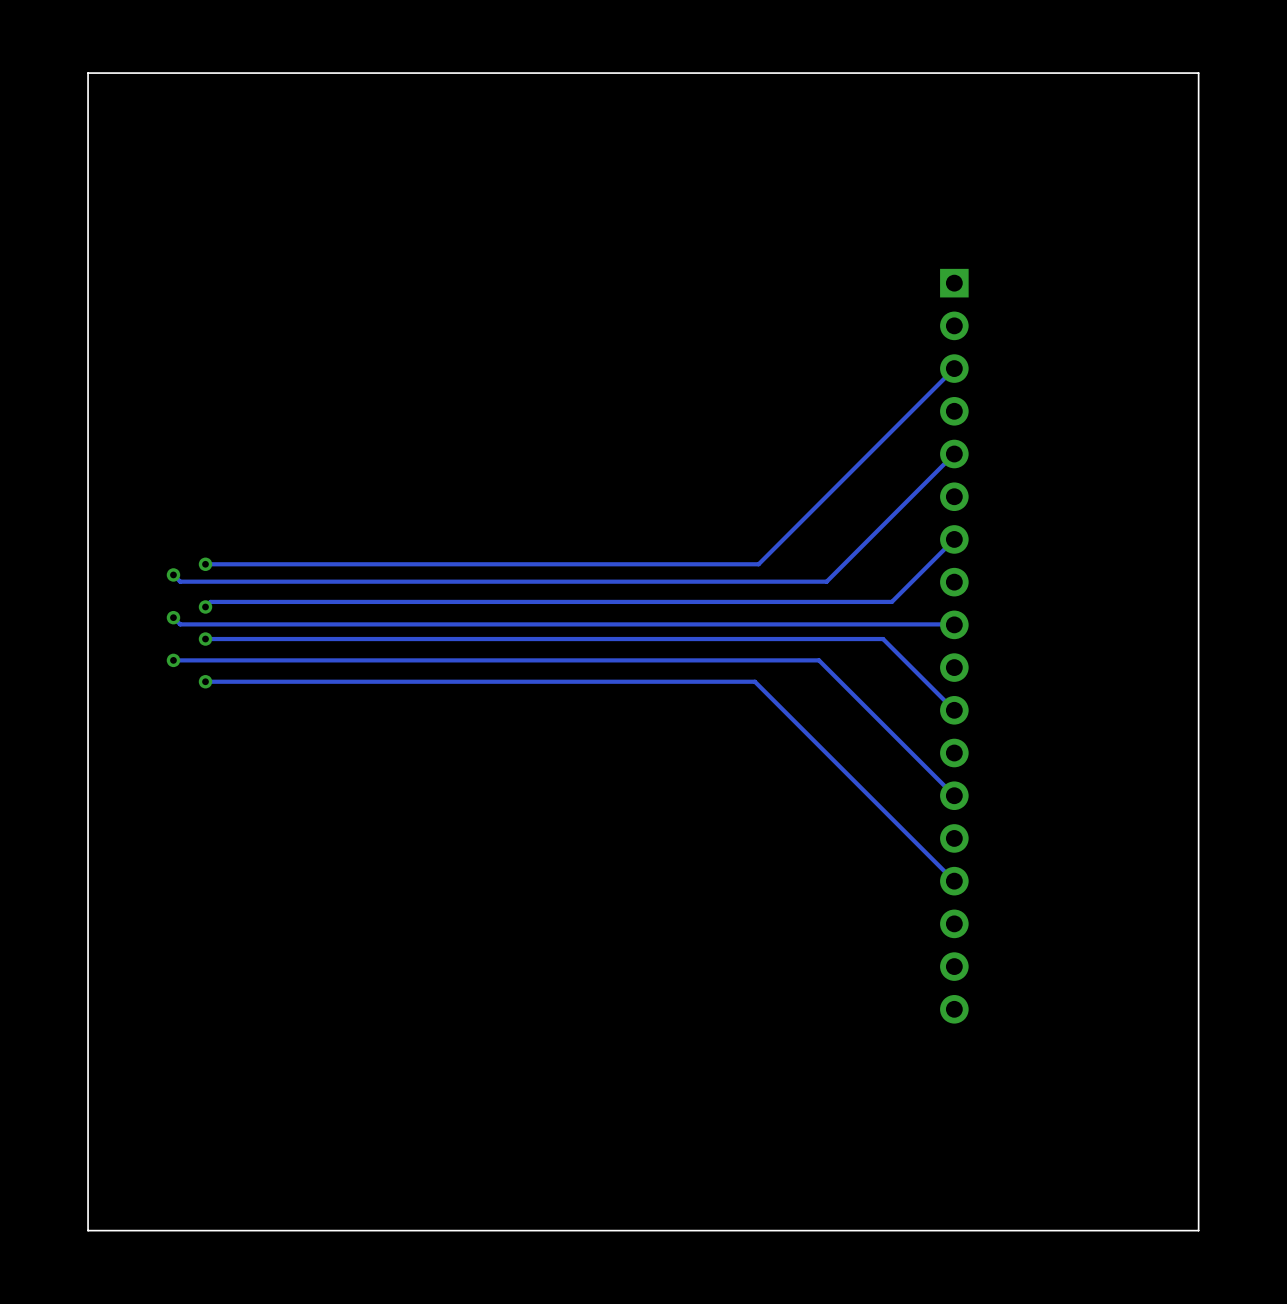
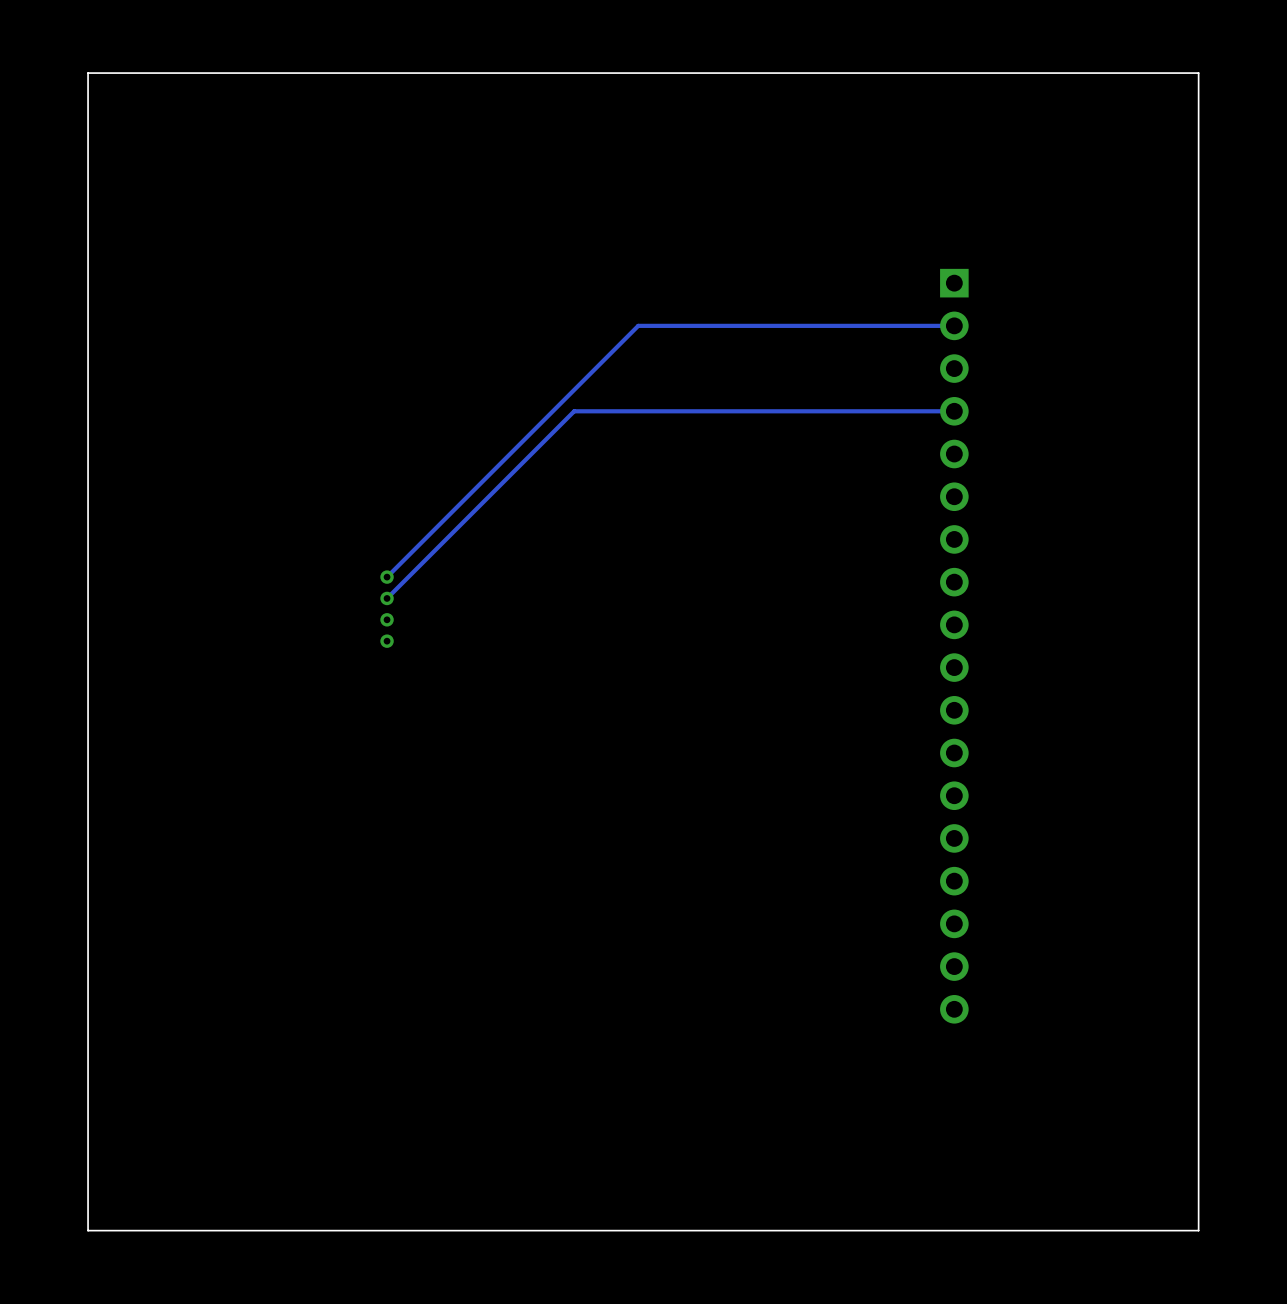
track: none -> (954, 325) (638, 325) (387, 577)
track: (954, 368) (758, 564) (205, 564) -> none
track: none -> (954, 411) (574, 411) (387, 598)
track: (954, 454) (826, 581) (180, 581) (173, 574) -> none
track: (954, 539) (891, 601) (210, 601) (205, 606) -> none
via: (205, 564) -> none
via: (173, 574) -> none
via: none -> (387, 577)
via: none -> (387, 598)
via: (205, 606) -> none
track: (173, 617) (180, 624) (954, 624) -> none
via: (173, 617) -> none
via: none -> (387, 619)
track: (205, 639) (883, 639) (954, 710) -> none
via: (205, 639) -> none
via: none -> (387, 641)
track: (173, 660) (819, 660) (954, 795) -> none
via: (173, 660) -> none
track: (205, 681) (754, 681) (954, 881) -> none
via: (205, 681) -> none

